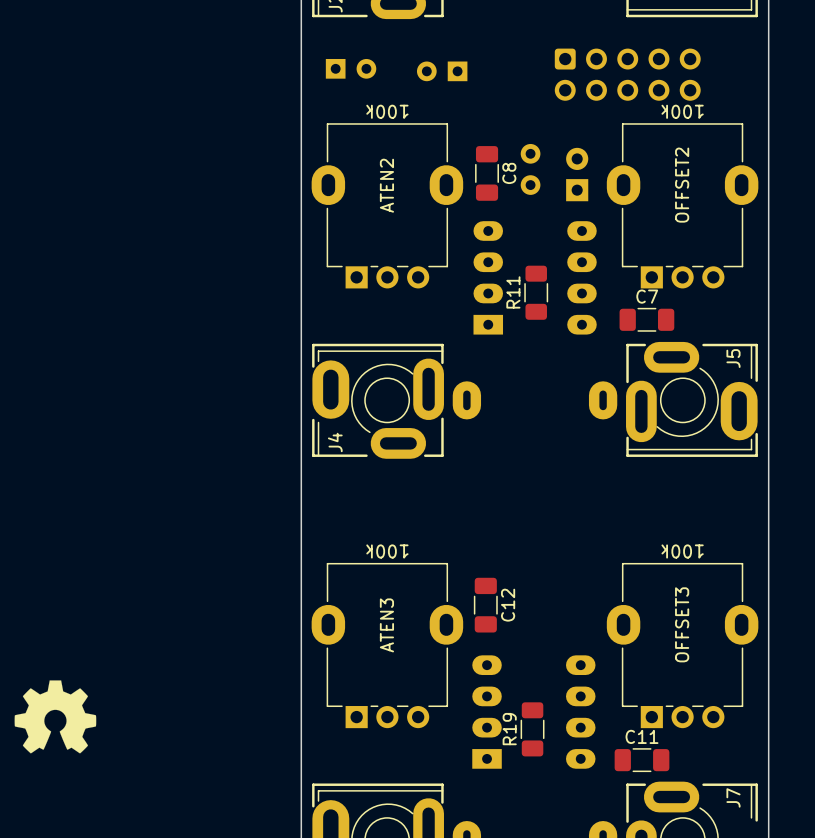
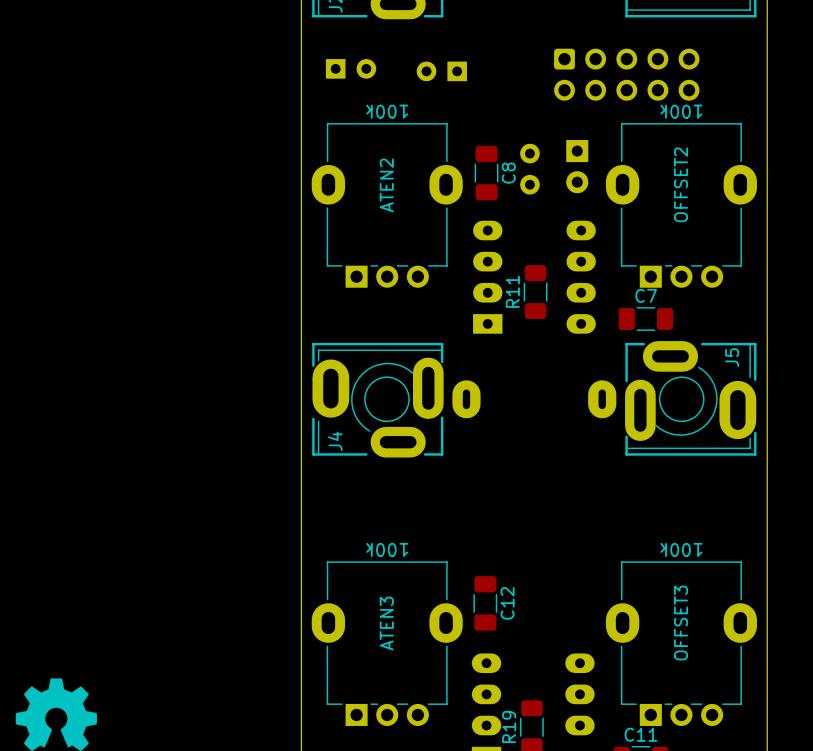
part rotation: 0° (577, 174) -> 180° (577, 166)

